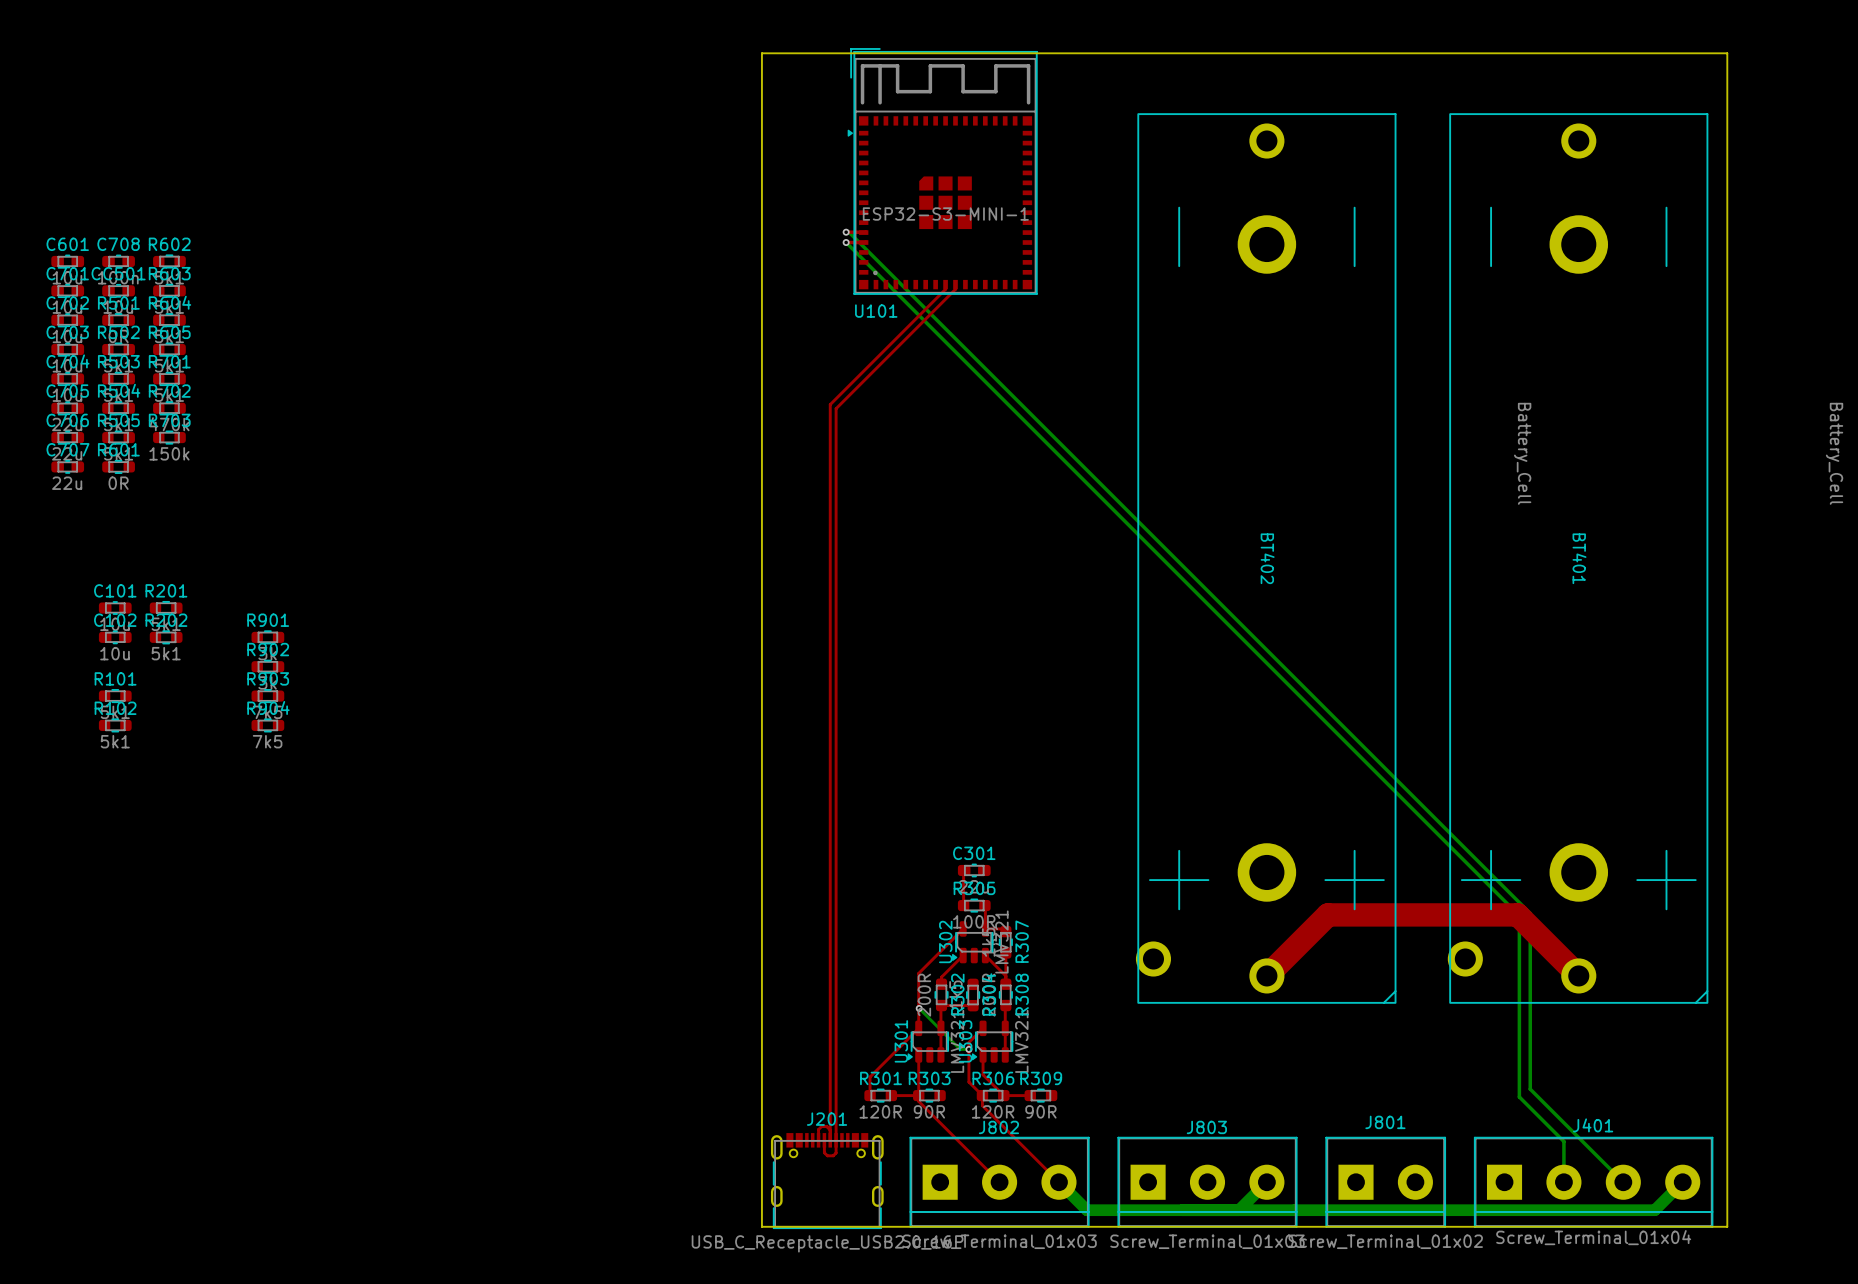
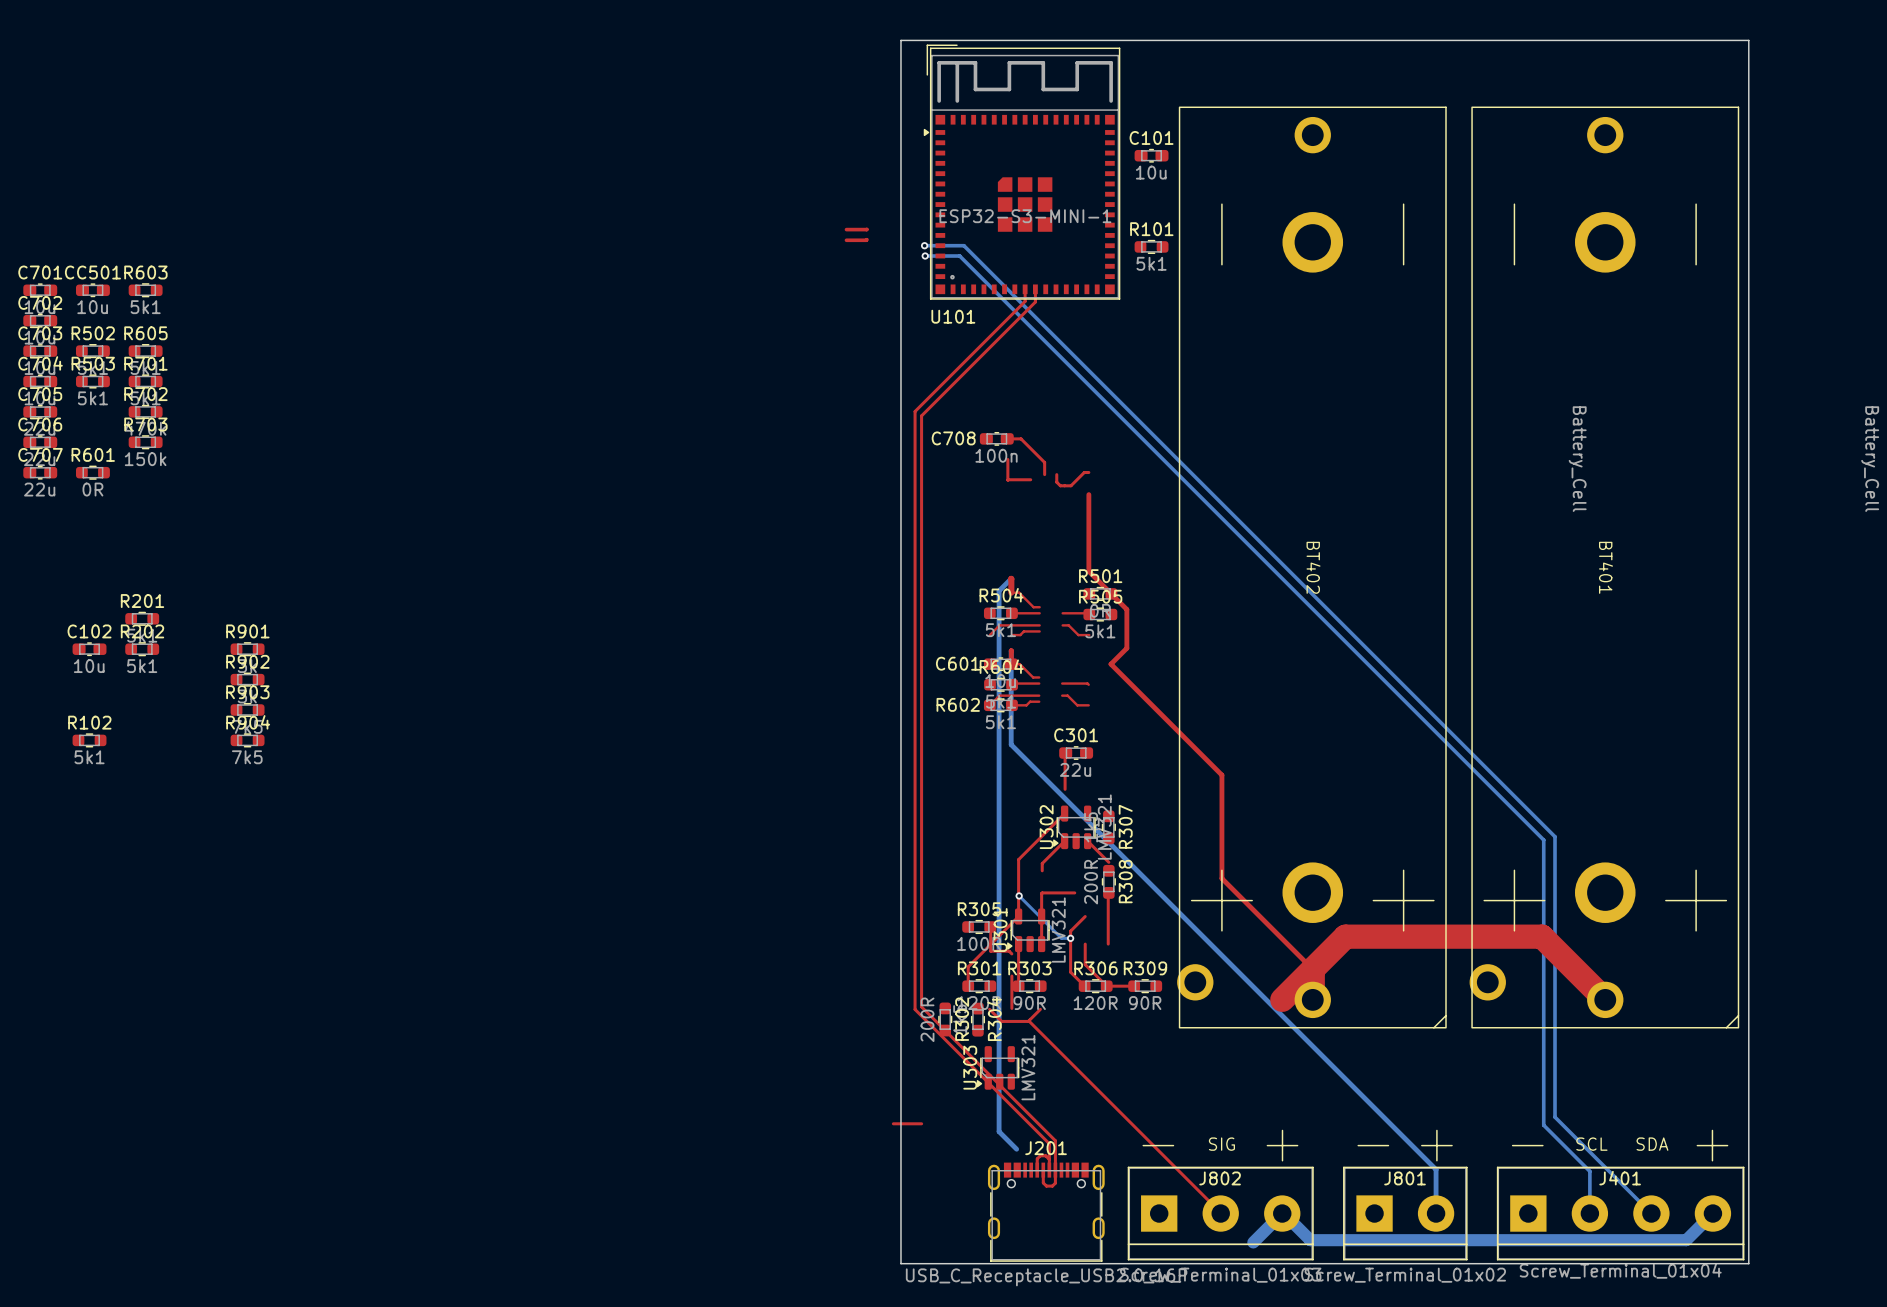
board edge: (761, 53) (1727, 53) (1727, 1226) (761, 1226) (761, 53) -> (900, 40) (900, 1263) (1748, 1263) (1748, 40) (900, 40)
U101 position: (942, 171) -> (1022, 172)
bottom track: (846, 232) (849, 232) (1530, 913) -> (924, 245) (963, 245) (1555, 836) (1555, 935)
via: (846, 232) -> none
bottom track: (846, 242) (1519, 915) -> (925, 256) (959, 256) (1543, 840) (1543, 937)
via: (846, 242) -> none
C601 name position: C601 (67, 244) -> C601 (957, 663)
C708 name position: C708 (118, 244) -> C708 (953, 438)
R602 name position: R602 (169, 244) -> R602 (958, 704)
via: none -> (924, 245)
via: none -> (925, 256)
C601 position: (67, 261) -> (1000, 664)
C708 position: (118, 261) -> (996, 438)
R602 position: (169, 261) -> (1000, 705)
top track: (945, 284) (945, 289) (830, 404) (830, 1140) -> none
top track: (955, 284) (955, 289) (836, 408) (836, 1153) (833, 1155) (827, 1155) (824, 1152) (824, 1140) -> none
top track: none -> (1025, 289) (1025, 301) (915, 411) (915, 1009) (1049, 1143) (1049, 1170)
top track: none -> (1035, 289) (1035, 302) (921, 415) (921, 1006) (1055, 1140) (1055, 1183) (1052, 1186) (1046, 1186) (1043, 1182) (1043, 1170)
R501 position: (118, 320) -> (1100, 593)
R604 position: (169, 320) -> (1001, 684)
R504 position: (118, 408) -> (1000, 613)
top track: none -> (1007, 438) (1021, 438) (1044, 462) (1044, 474)
R505 position: (118, 437) -> (1100, 614)
top track: none -> (1007, 459) (1007, 480) (1030, 479)
top track: none -> (1088, 472) (1084, 472) (1071, 485) (1060, 485) (1056, 482) (1056, 474)
top track: none -> (1088, 494) (1088, 571) (1111, 593)
BT402 position: (1266, 558) -> (1311, 567)
top track: none -> (1011, 578) (1011, 592) (1019, 592) (1033, 607) (1039, 607)
bottom track: none -> (1011, 578) (999, 590) (999, 1131) (1016, 1149)
top track: none -> (1111, 594) (1126, 609) (1126, 648) (1110, 664) (1221, 775) (1221, 878) (1312, 969) (1312, 999) (1312, 976)
top track: none -> (1011, 613) (1039, 613)
top track: none -> (1062, 613) (1089, 614)
C101 position: (115, 608) -> (1151, 155)
top track: none -> (1039, 625) (999, 625) (989, 635)
top track: none -> (1062, 625) (1068, 625) (1078, 635) (1089, 635)
top track: none -> (1039, 631) (1023, 631) (1020, 635) (1011, 635)
bottom track: none -> (1011, 650) (1011, 744) (1436, 1169) (1436, 1213)
top track: none -> (1011, 650) (1011, 664) (1019, 664) (1033, 677) (1039, 677)
top track: none -> (1039, 683) (1012, 684)
top track: none -> (1062, 683) (1088, 684)
top track: none -> (1039, 695) (999, 695) (989, 705)
top track: none -> (1062, 695) (1067, 695) (1077, 705) (1088, 705)
top track: none -> (1039, 701) (1030, 701) (1026, 705) (1011, 705)
R101 position: (115, 696) -> (1151, 246)
top track: (964, 870) (963, 905) -> (1065, 753) (1065, 789)
C301 position: (974, 870) -> (1076, 753)
via: none -> (1019, 895)
top track: none -> (1085, 916) (1070, 931) (1070, 972) (1084, 986)
via: none -> (1070, 938)
top track: none -> (1018, 944) (1018, 986)
top track: (963, 928) (918, 973) (918, 1028) (870, 1077) (870, 1095) -> (1064, 813) (1018, 859) (1018, 916) (968, 966) (968, 986)
U302 position: (972, 942) -> (1074, 827)
R307 position: (1005, 942) -> (1108, 827)
top track: (963, 955) (941, 977) (941, 984) -> (1064, 841) (1042, 863) (1042, 870)
top track: (985, 955) (1005, 976) -> (1087, 841) (1108, 862)
top track: none -> (989, 1009) (1001, 1021) (1028, 1021) (1040, 1009)
R308 position: (1005, 994) -> (1108, 881)
top track: none -> (1029, 1020) (1220, 1212)
top track: (972, 1005) (940, 1006) (940, 1054) -> (1074, 892) (1041, 893) (1041, 944)
top track: (1005, 1005) (1005, 1054) -> (1108, 892) (1108, 944)
bottom track: (919, 1008) (960, 1049) (968, 1049) -> (1019, 895) (1061, 938) (1070, 938)
via: (919, 1008) -> none
top track: (983, 1028) (968, 1042) (968, 1082) (982, 1095) (982, 1105) (1058, 1182) -> none
U301 position: (928, 1041) -> (1028, 930)
via: (968, 1049) -> none
top track: (918, 1054) (918, 1101) (999, 1182) -> none
top track: (983, 1054) (983, 1074) (1003, 1095) (1030, 1095) -> (1085, 944) (1085, 964) (1106, 986) (1134, 986)
R301 position: (880, 1095) -> (979, 986)
R303 position: (929, 1095) -> (1029, 986)
R306 position: (993, 1095) -> (1095, 986)
R309 position: (1040, 1095) -> (1145, 986)
line: none -> (1282, 1130) (1282, 1160)
line: none -> (1436, 1130) (1436, 1160)
line: none -> (1712, 1130) (1712, 1160)
text: none -> SIG (1221, 1144)
text: none -> SCL (1591, 1144)
text: none -> SDA (1652, 1144)
line: none -> (1143, 1145) (1173, 1145)
line: none -> (1267, 1145) (1297, 1145)
line: none -> (1358, 1145) (1388, 1145)
line: none -> (1421, 1145) (1452, 1145)
line: none -> (1512, 1145) (1542, 1145)
line: none -> (1697, 1145) (1727, 1145)
J801 name position: J801 (1385, 1122) -> J801 (1405, 1178)
J401 name position: J401 (1593, 1125) -> J401 (1620, 1178)
J803 name: J803 (1206, 1127) -> J802 (1220, 1178)
top track: (830, 1130) (826, 1126) (821, 1126) (818, 1129) (818, 1140) -> (1049, 1159) (1045, 1155) (1040, 1155) (1037, 1158) (1037, 1170)
J201 position: (827, 1180) -> (1046, 1212)
J802: Screw_Terminal_01x03 (999, 1182) -> none
bottom track: (1058, 1182) (1086, 1210) (1654, 1210) (1657, 1207) -> (1282, 1213) (1310, 1240) (1686, 1240)

